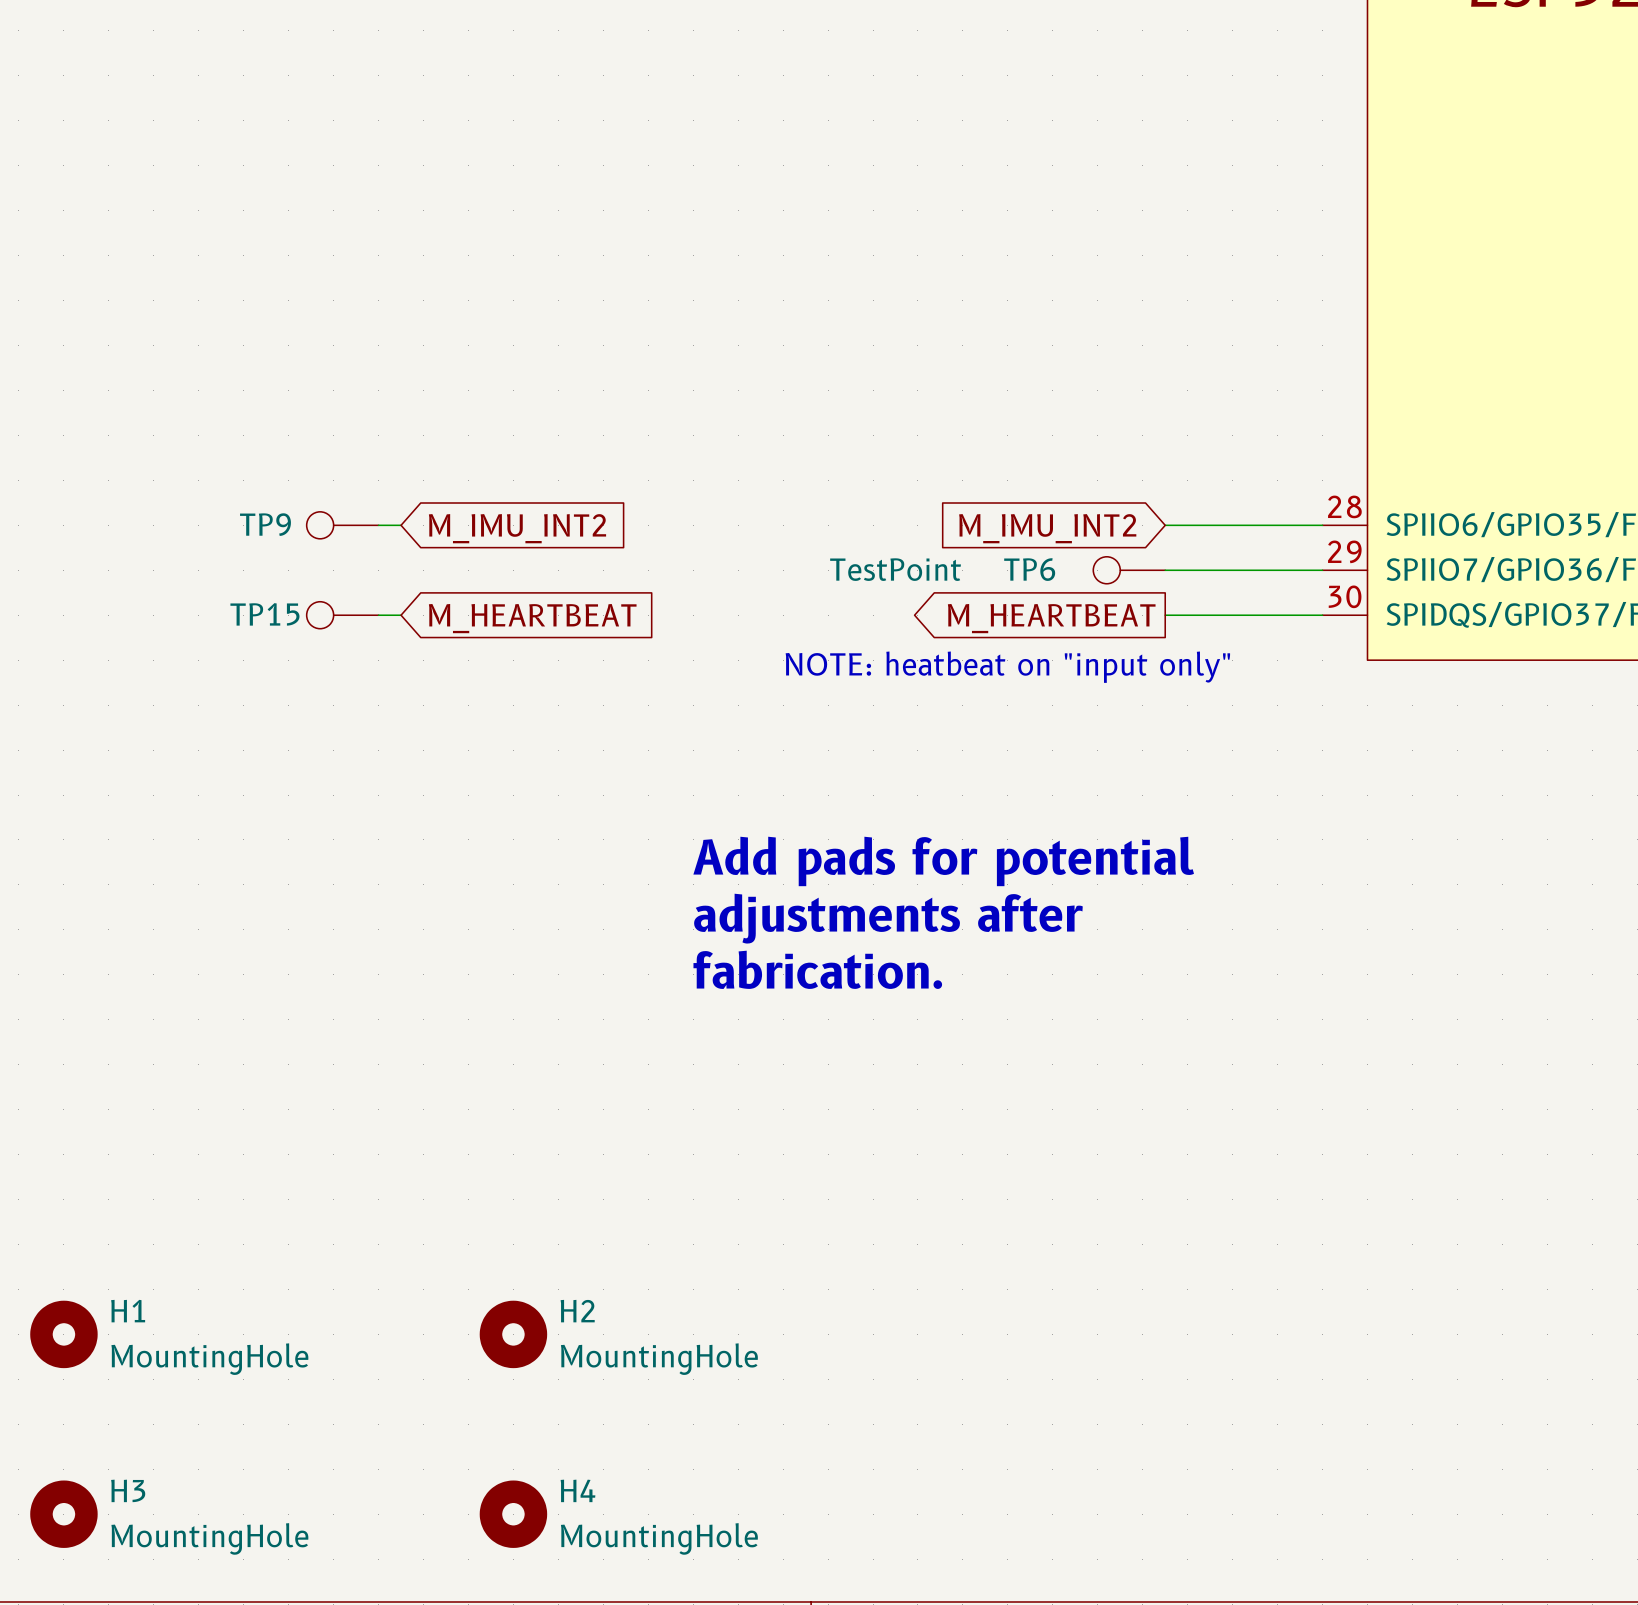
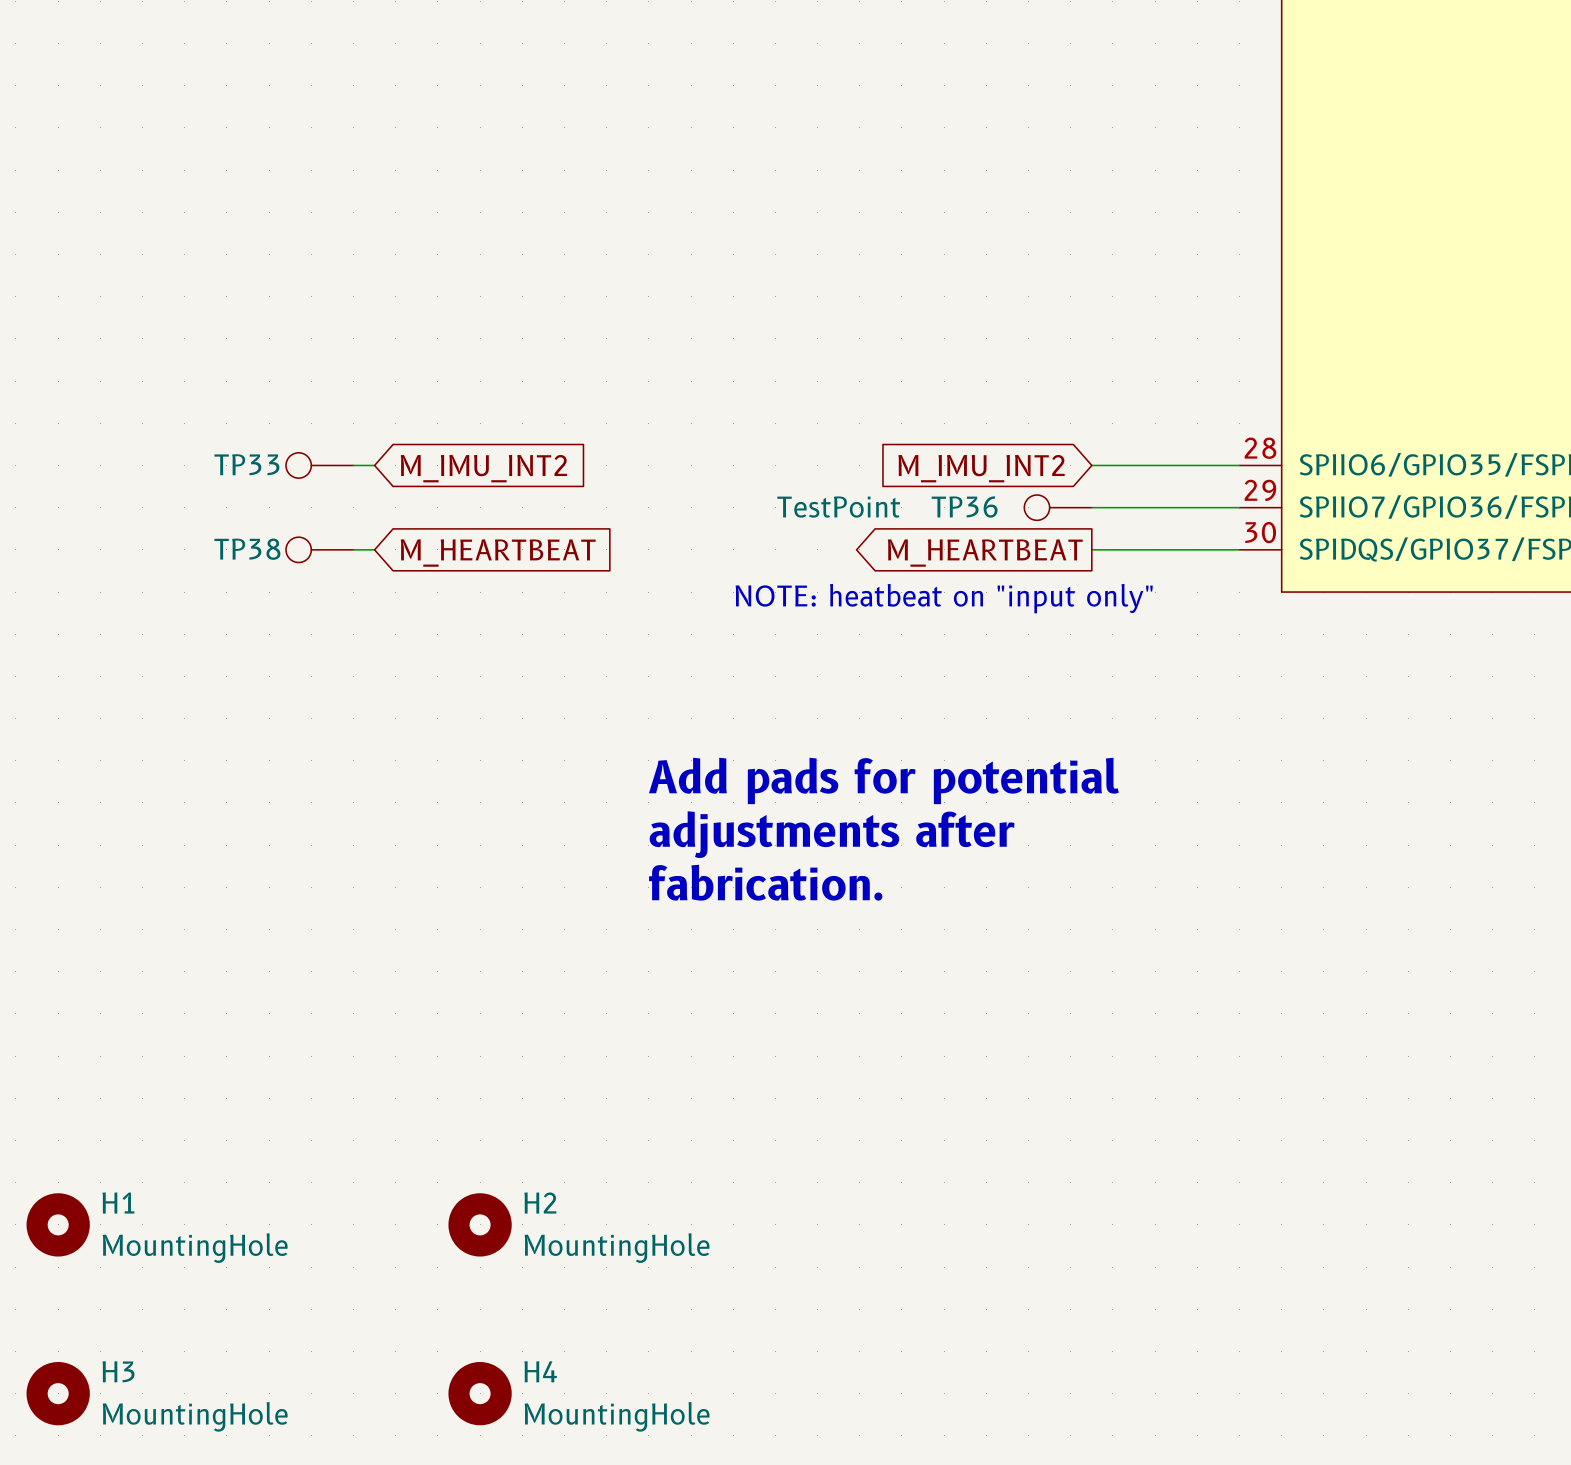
TP9 name: TP9 (265, 524) -> TP33 (246, 464)
TP6 name: TP6 (1029, 569) -> TP36 (964, 507)
TP15 name: TP15 (264, 614) -> TP38 (247, 549)

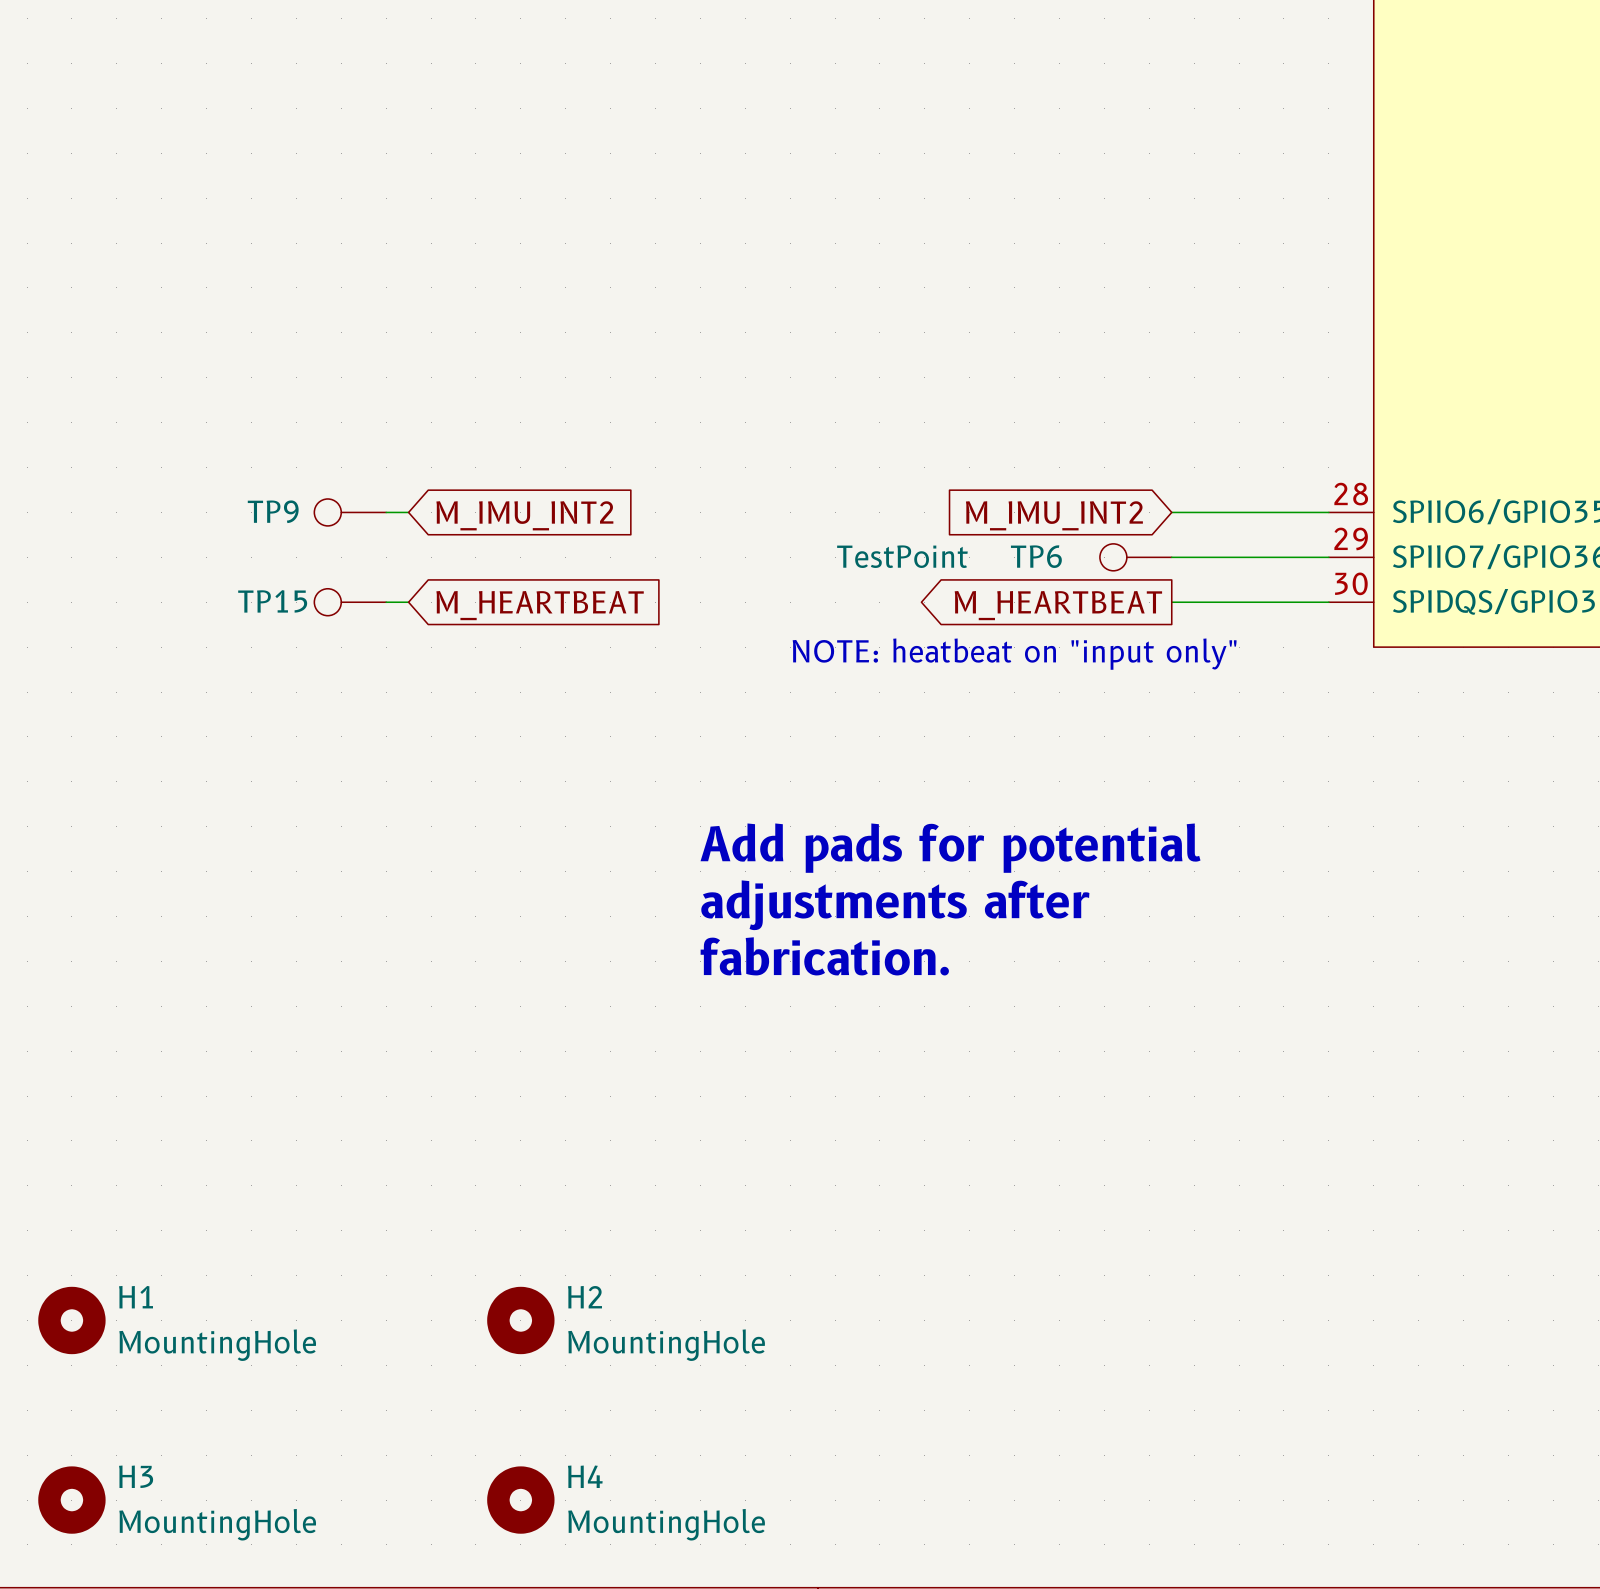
TP33 name: TP33 (246, 464) -> TP9 (273, 511)
TP36 name: TP36 (964, 507) -> TP6 (1036, 556)
TP38 name: TP38 (247, 549) -> TP15 (272, 601)

